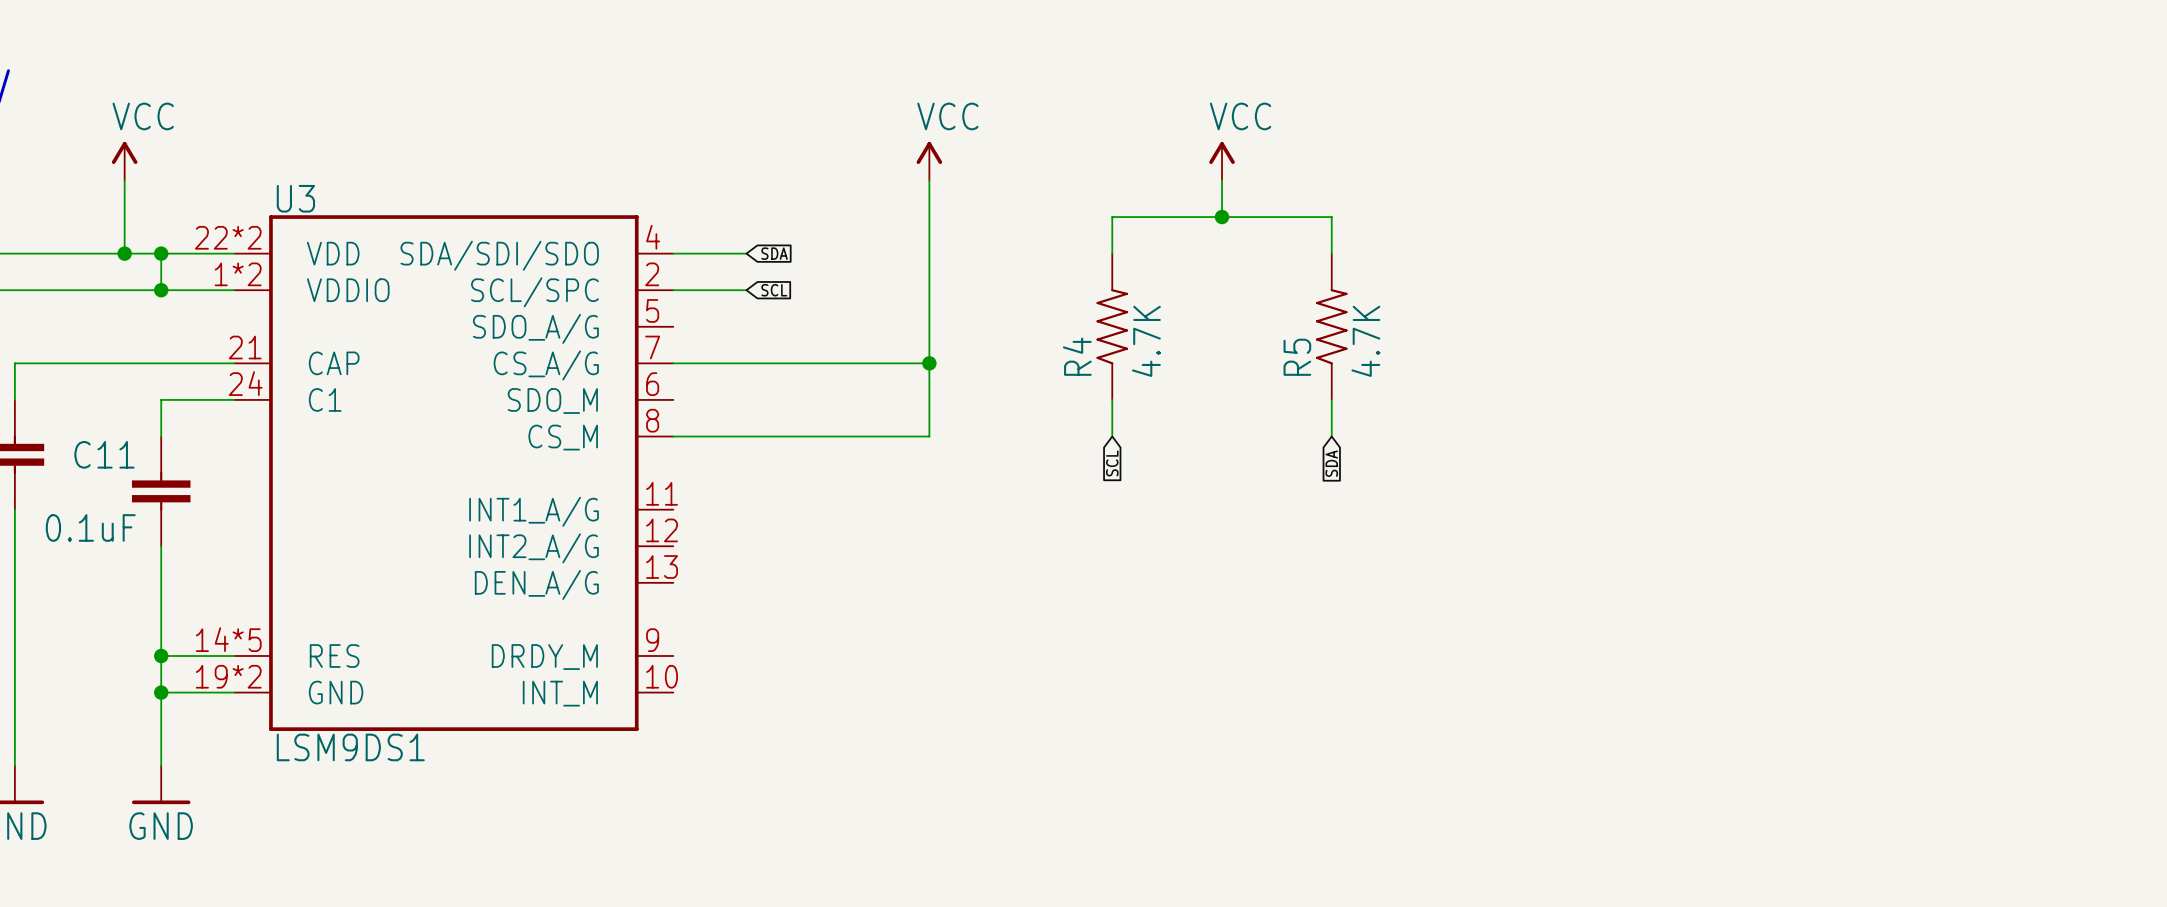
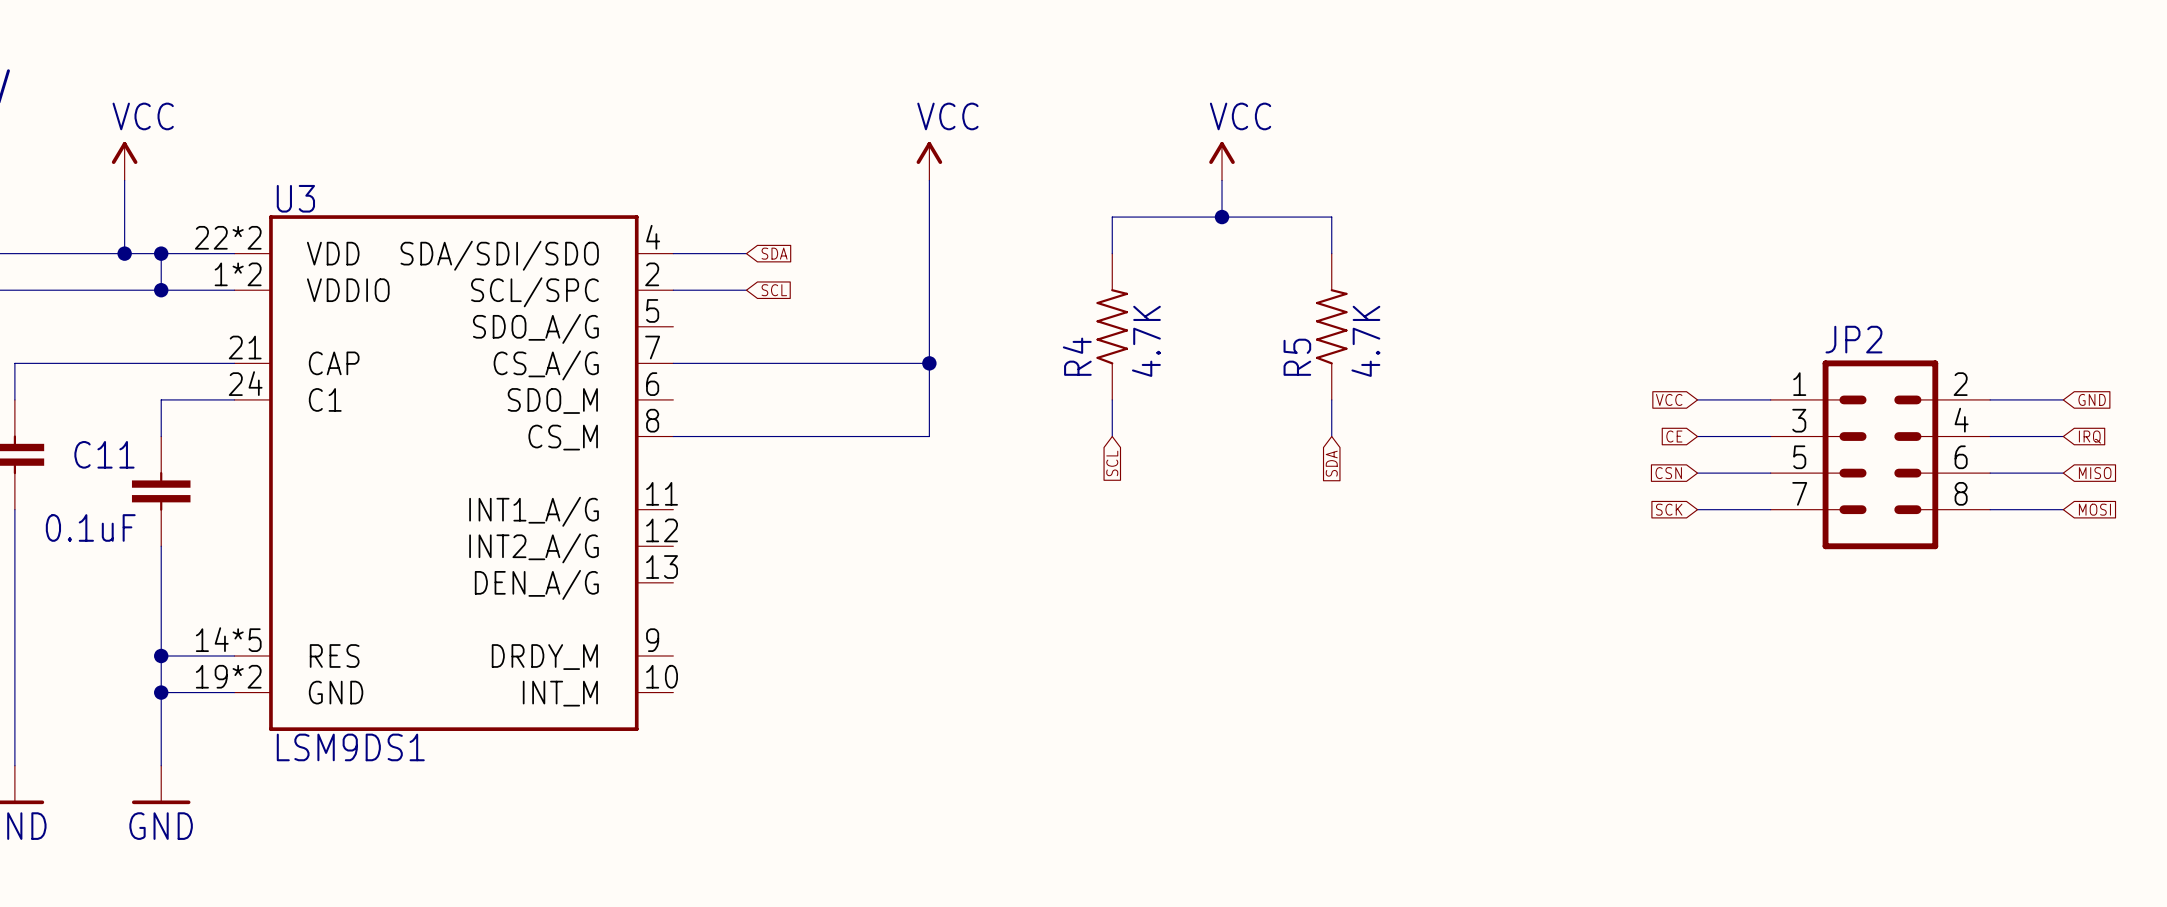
global label: none -> VCC (1669, 399)
wire: none -> (1697, 399) (1770, 399)
wire: none -> (1990, 399) (2063, 399)
global label: none -> GND (2092, 399)
global label: none -> CE (1674, 436)
wire: none -> (1697, 436) (1770, 436)
wire: none -> (1990, 436) (2063, 436)
global label: none -> IRQ (2089, 437)
JP2: none -> (1880, 454)
global label: none -> CSN (1668, 473)
wire: none -> (1697, 473) (1770, 473)
wire: none -> (1990, 473) (2063, 473)
global label: none -> MISO (2095, 473)
global label: none -> SCK (1669, 509)
wire: none -> (1697, 509) (1770, 509)
wire: none -> (1990, 509) (2063, 509)
global label: none -> MOSI (2094, 509)

